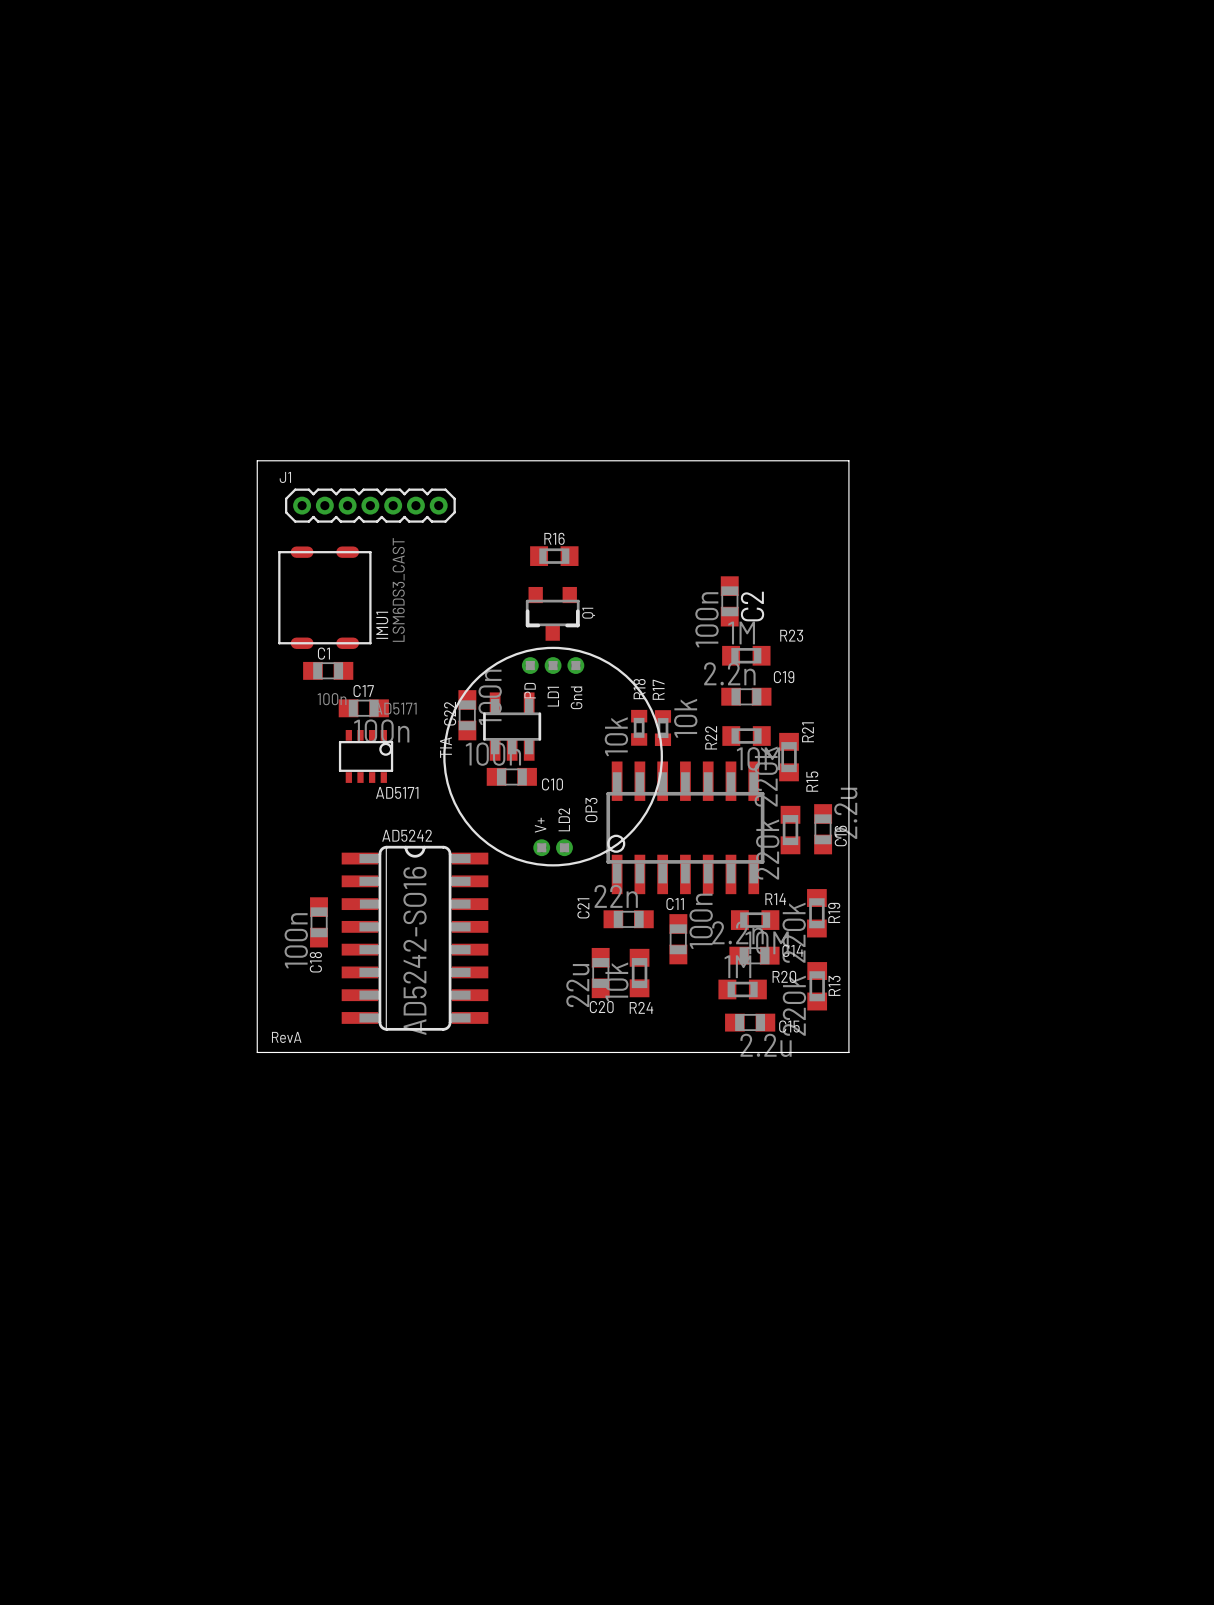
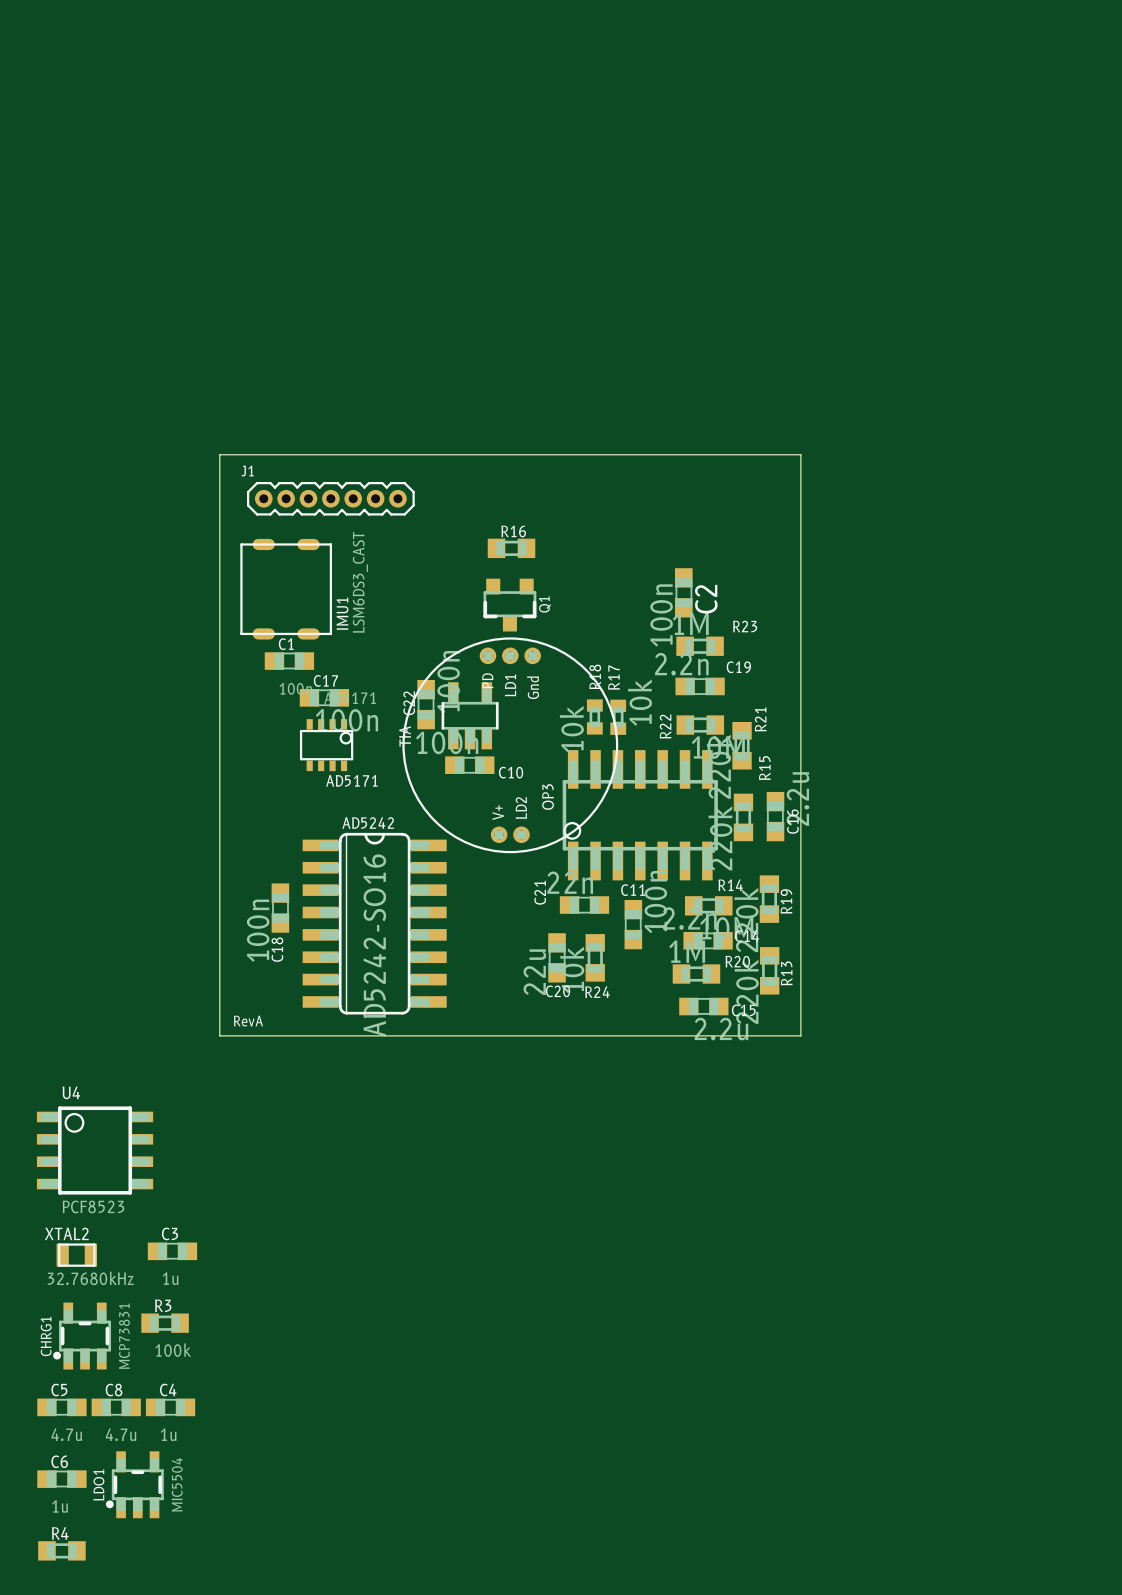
U4: none -> PCF8523 (95, 1150)
C3: none -> 1u (172, 1251)
XTAL2: none -> 32.7680kHz (76, 1255)
R3: none -> 100k (165, 1323)
CHRG1: none -> MCP73831 (82, 1336)
C5: none -> 4.7u (61, 1407)
C8: none -> 4.7u (116, 1407)
C4: none -> 1u (170, 1407)
C6: none -> 1u (61, 1479)
LDO1: none -> MIC5504 (134, 1484)
R4: none -> (61, 1550)

